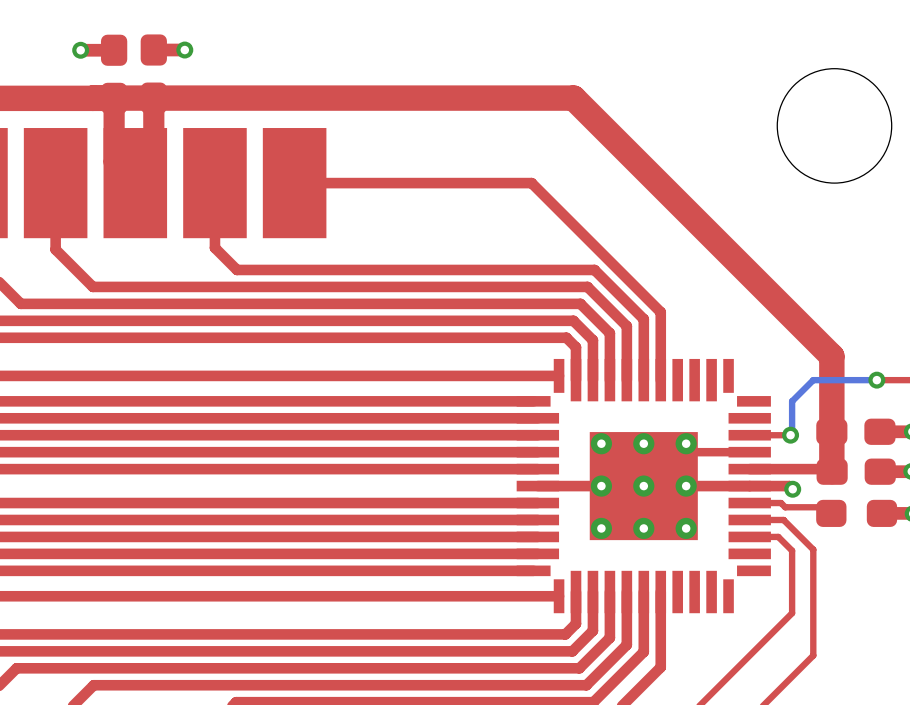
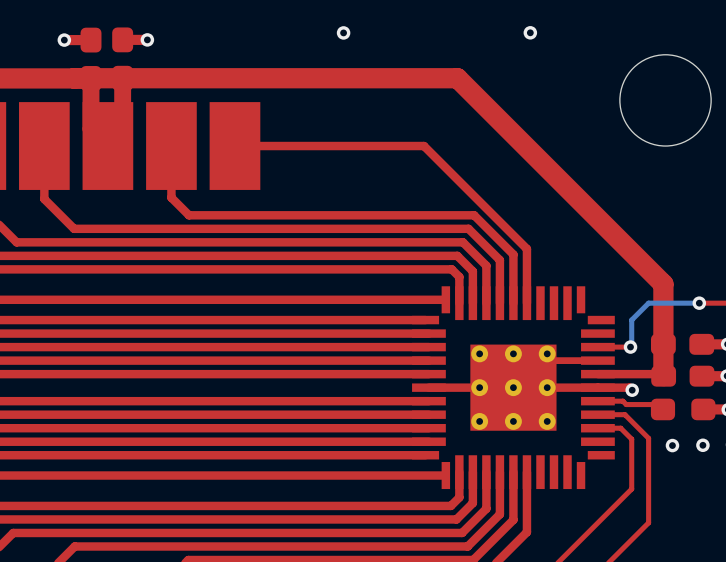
via: none -> (343, 32)
via: none -> (530, 32)
via: none -> (672, 445)
via: none -> (702, 445)

